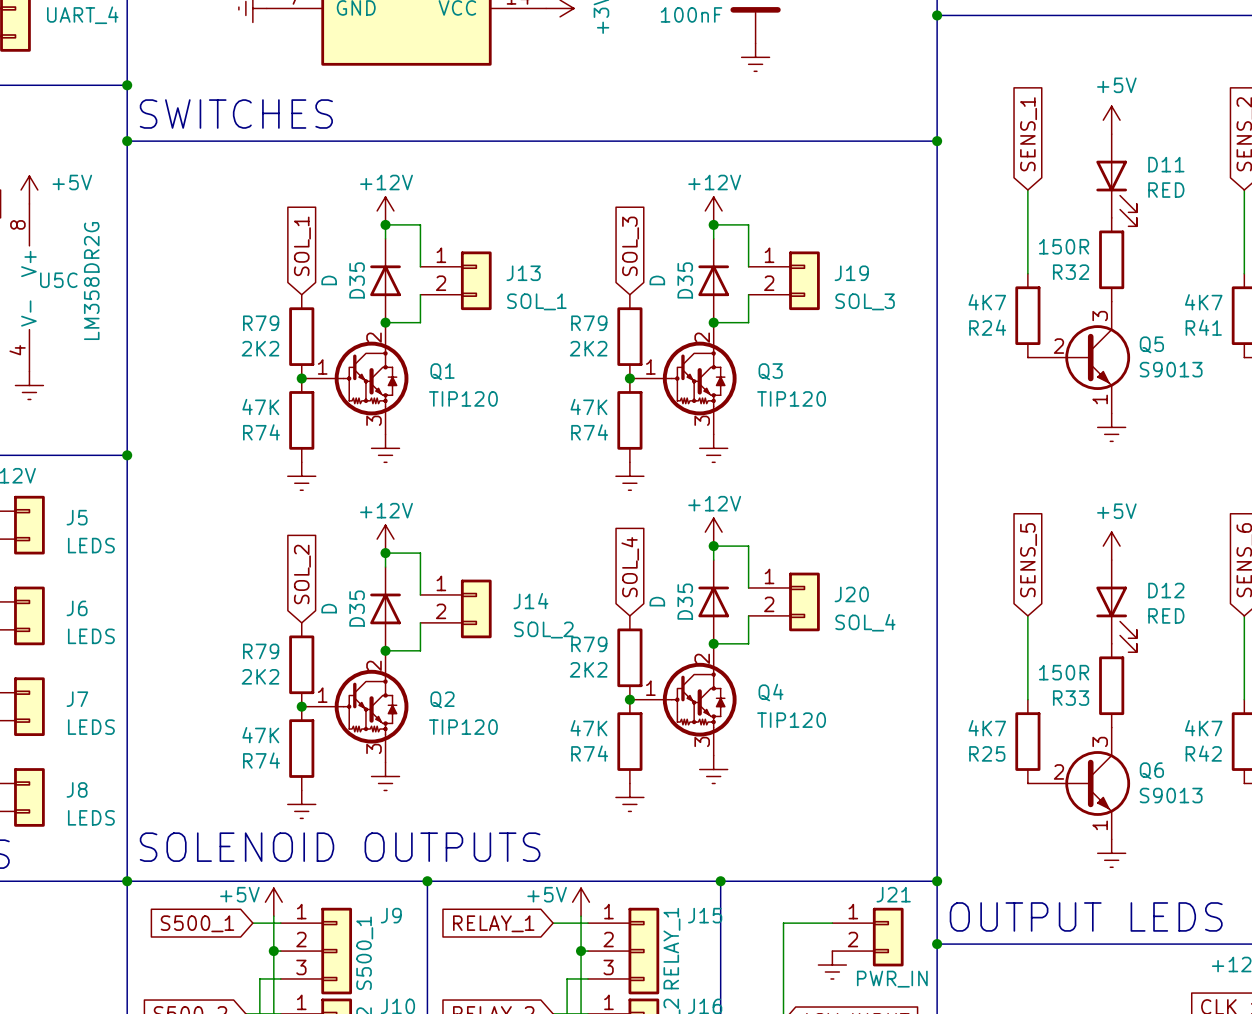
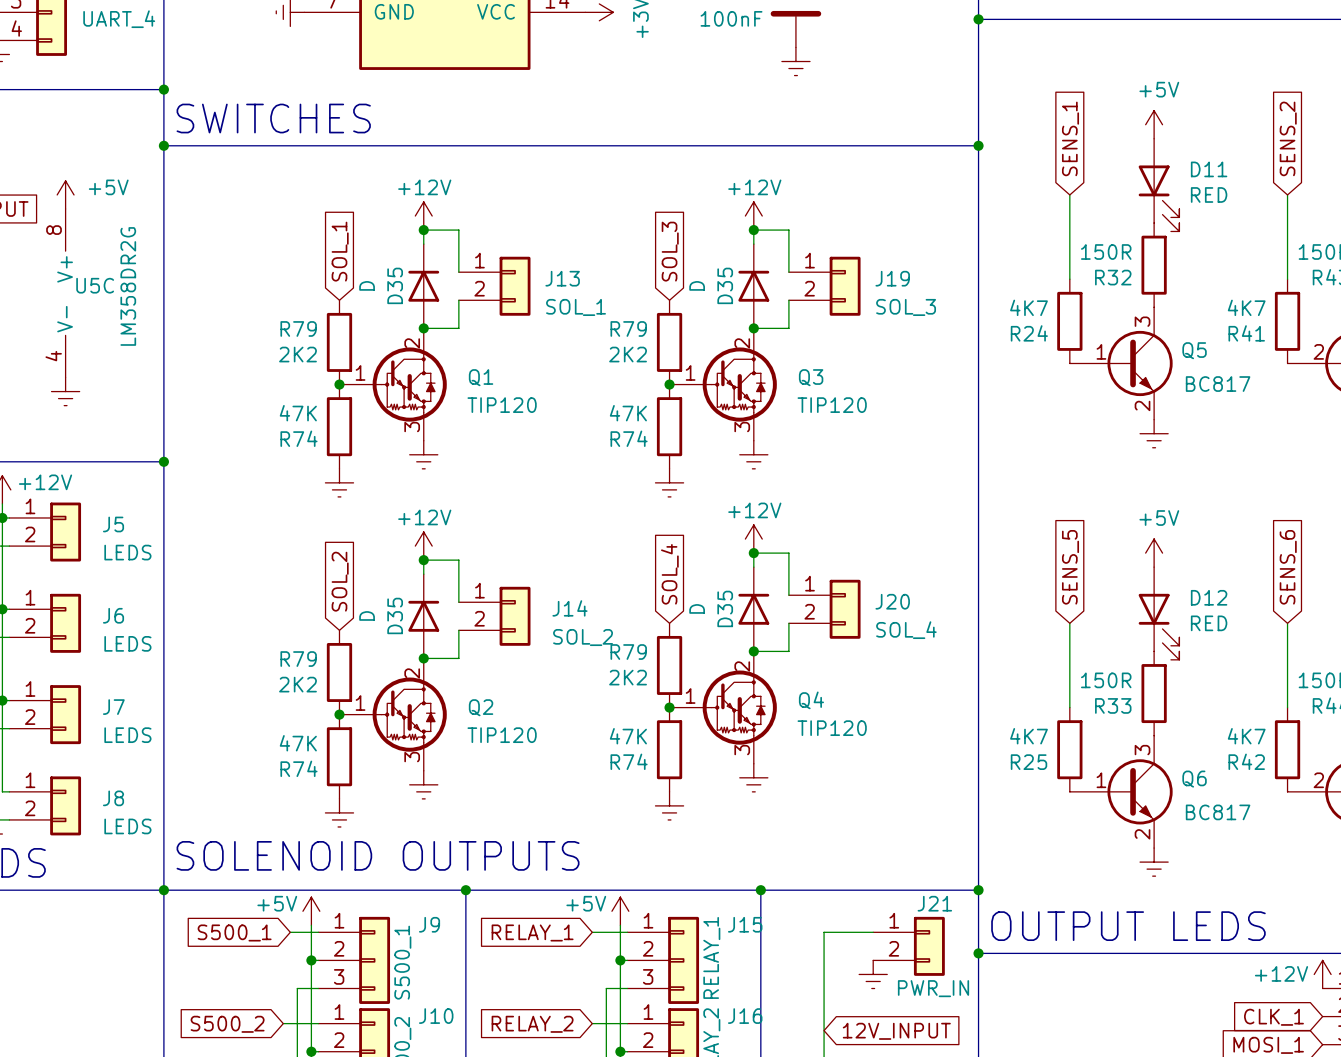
Q5 pin number: 2 (1058, 346) -> 1 (1101, 351)
Q5 value: S9013 (1171, 369) -> BC817 (1218, 384)
Q5 pin number: 1 (1100, 399) -> 2 (1142, 405)
Q6 pin number: 2 (1058, 771) -> 1 (1101, 780)
Q6 value: S9013 (1171, 795) -> BC817 (1218, 812)
Q6 pin number: 1 (1100, 825) -> 2 (1142, 834)

